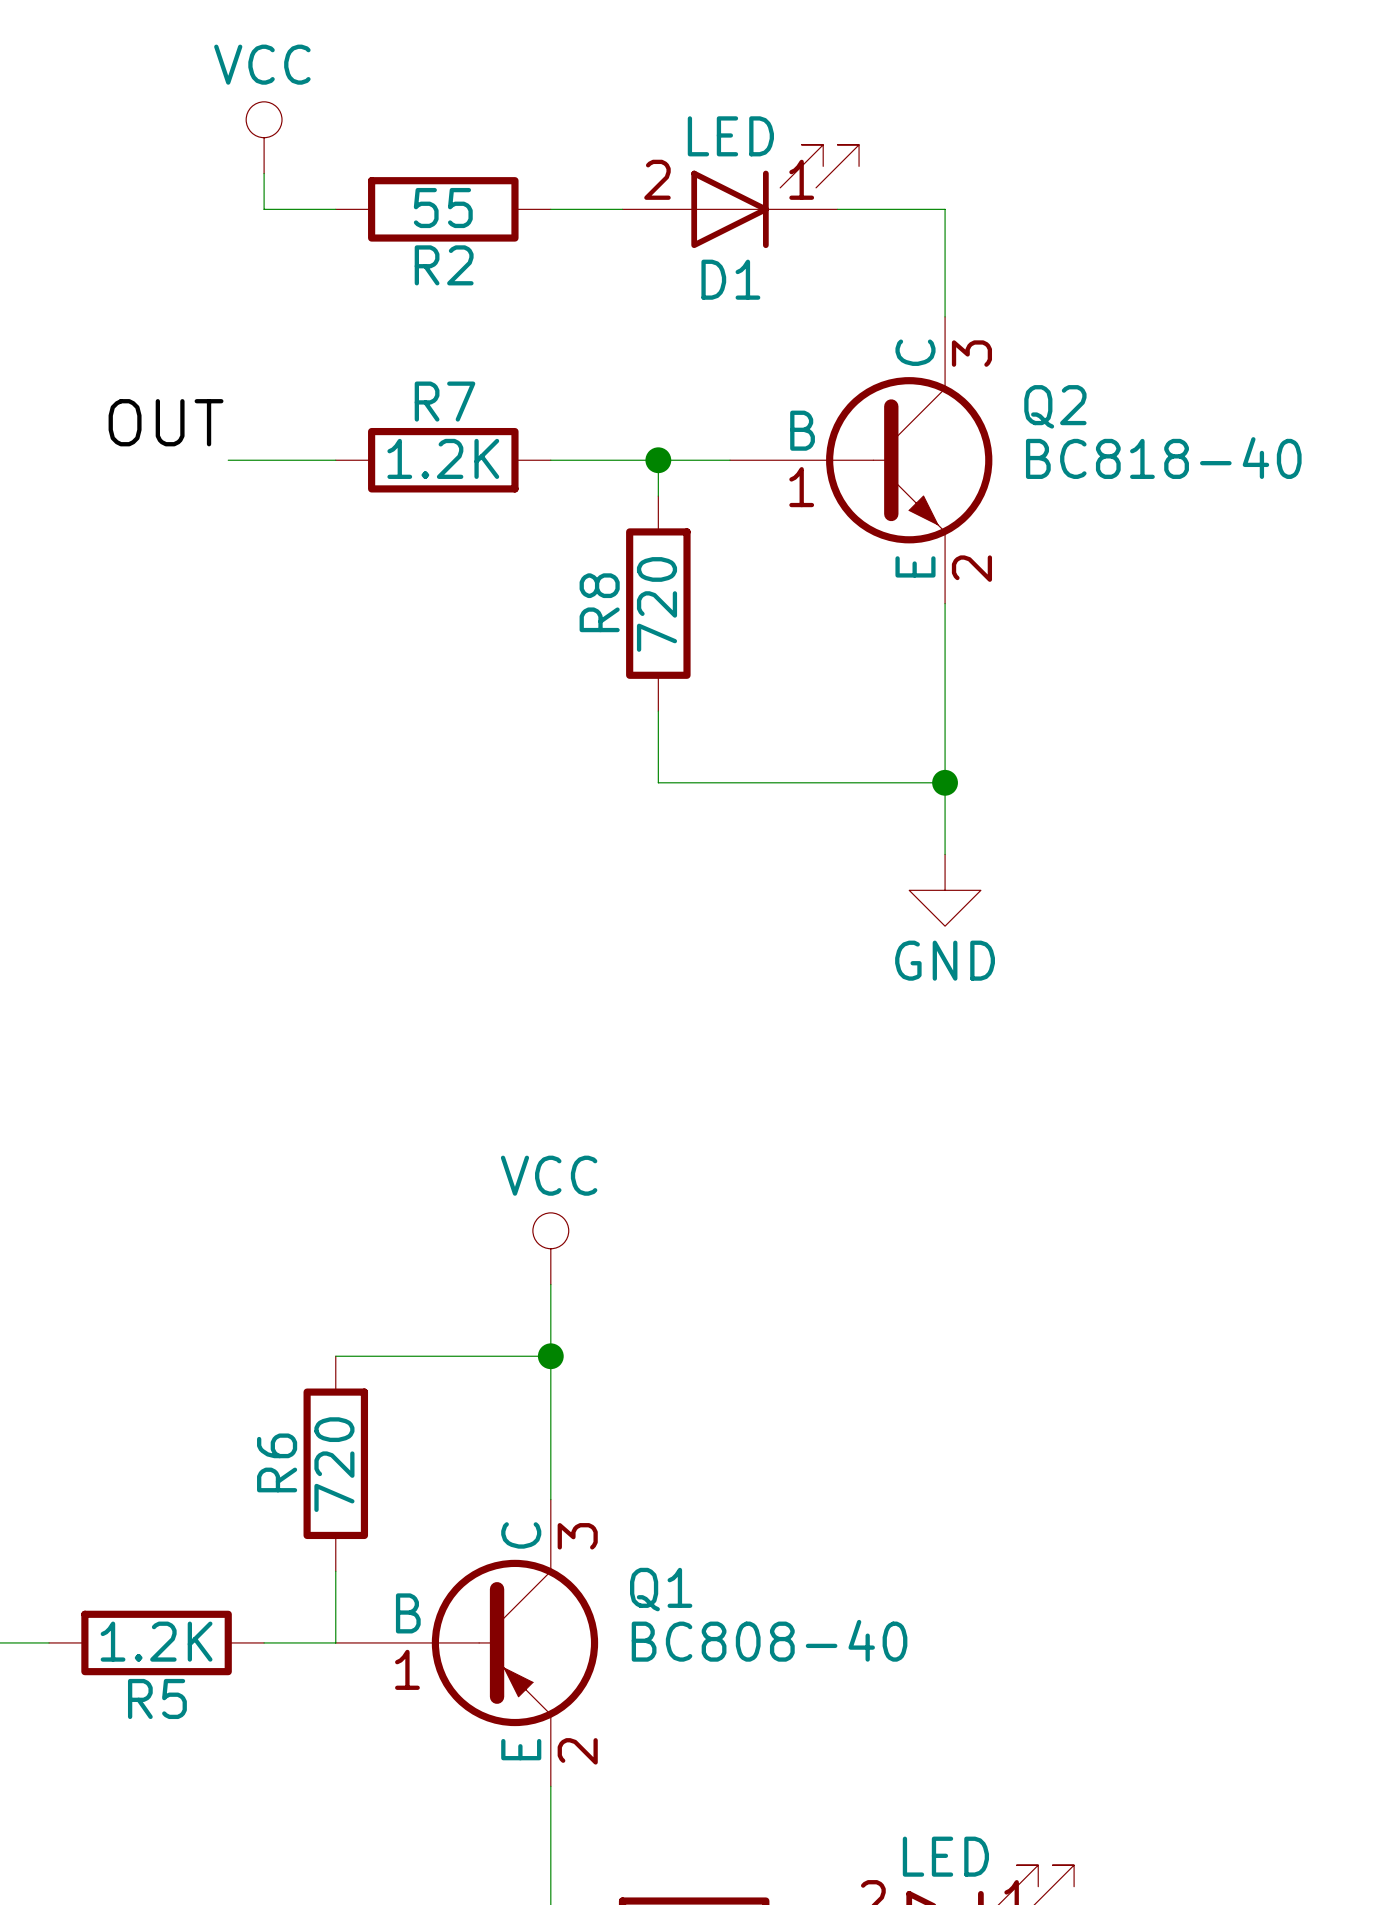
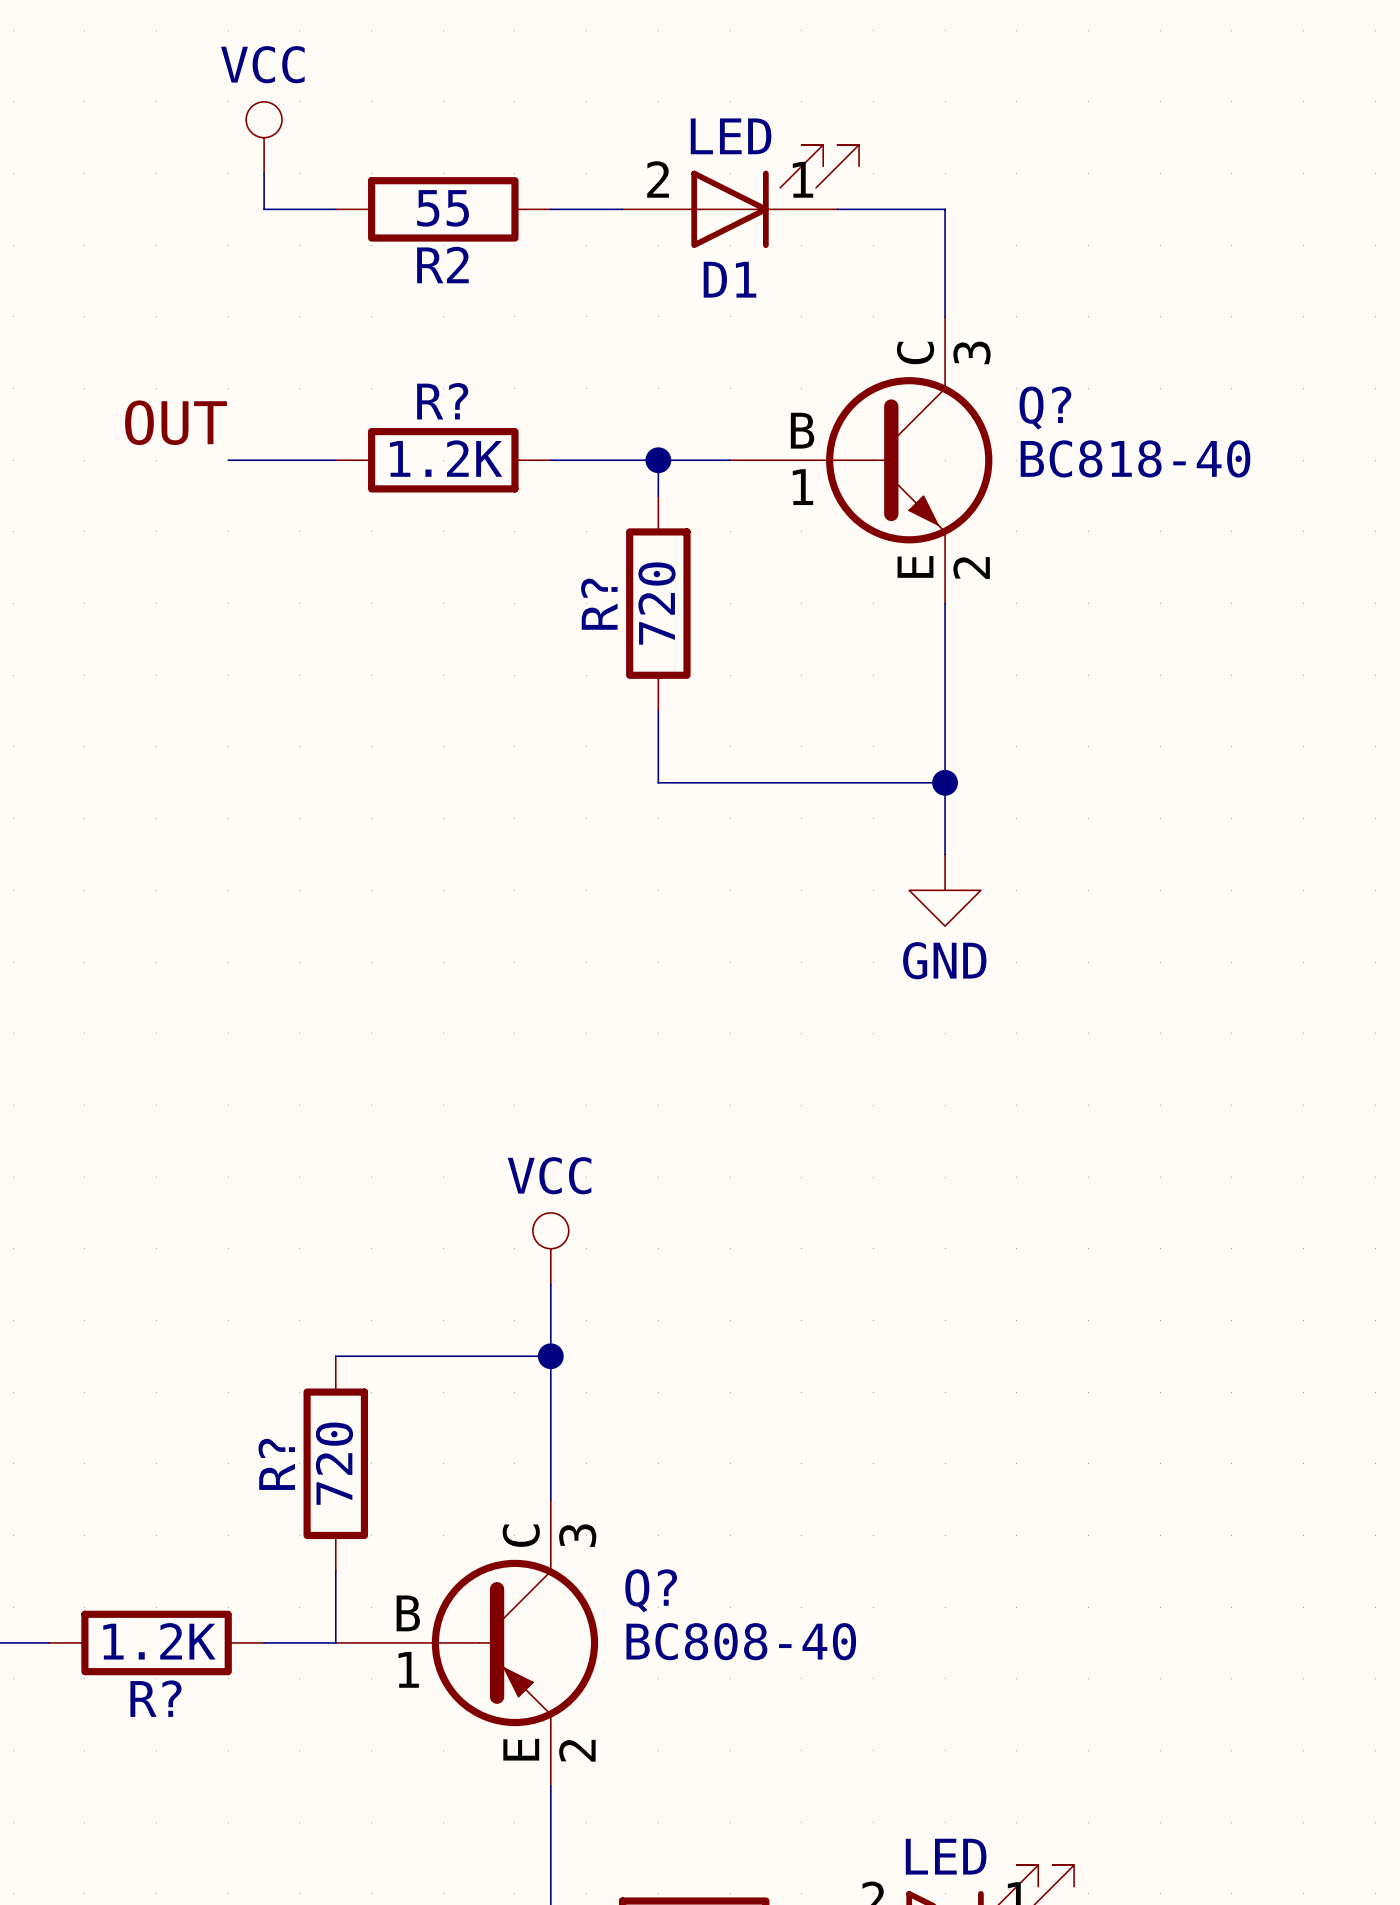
R7 name: R7 (445, 401) -> R? (442, 401)
Q2 name: Q2 (1055, 406) -> Q? (1045, 408)
R8 name: R8 (599, 602) -> R? (599, 604)
R6 name: R6 (277, 1462) -> R? (276, 1464)
Q1 name: Q1 (661, 1589) -> Q? (651, 1590)
R5 name: R5 (157, 1698) -> R? (155, 1698)

